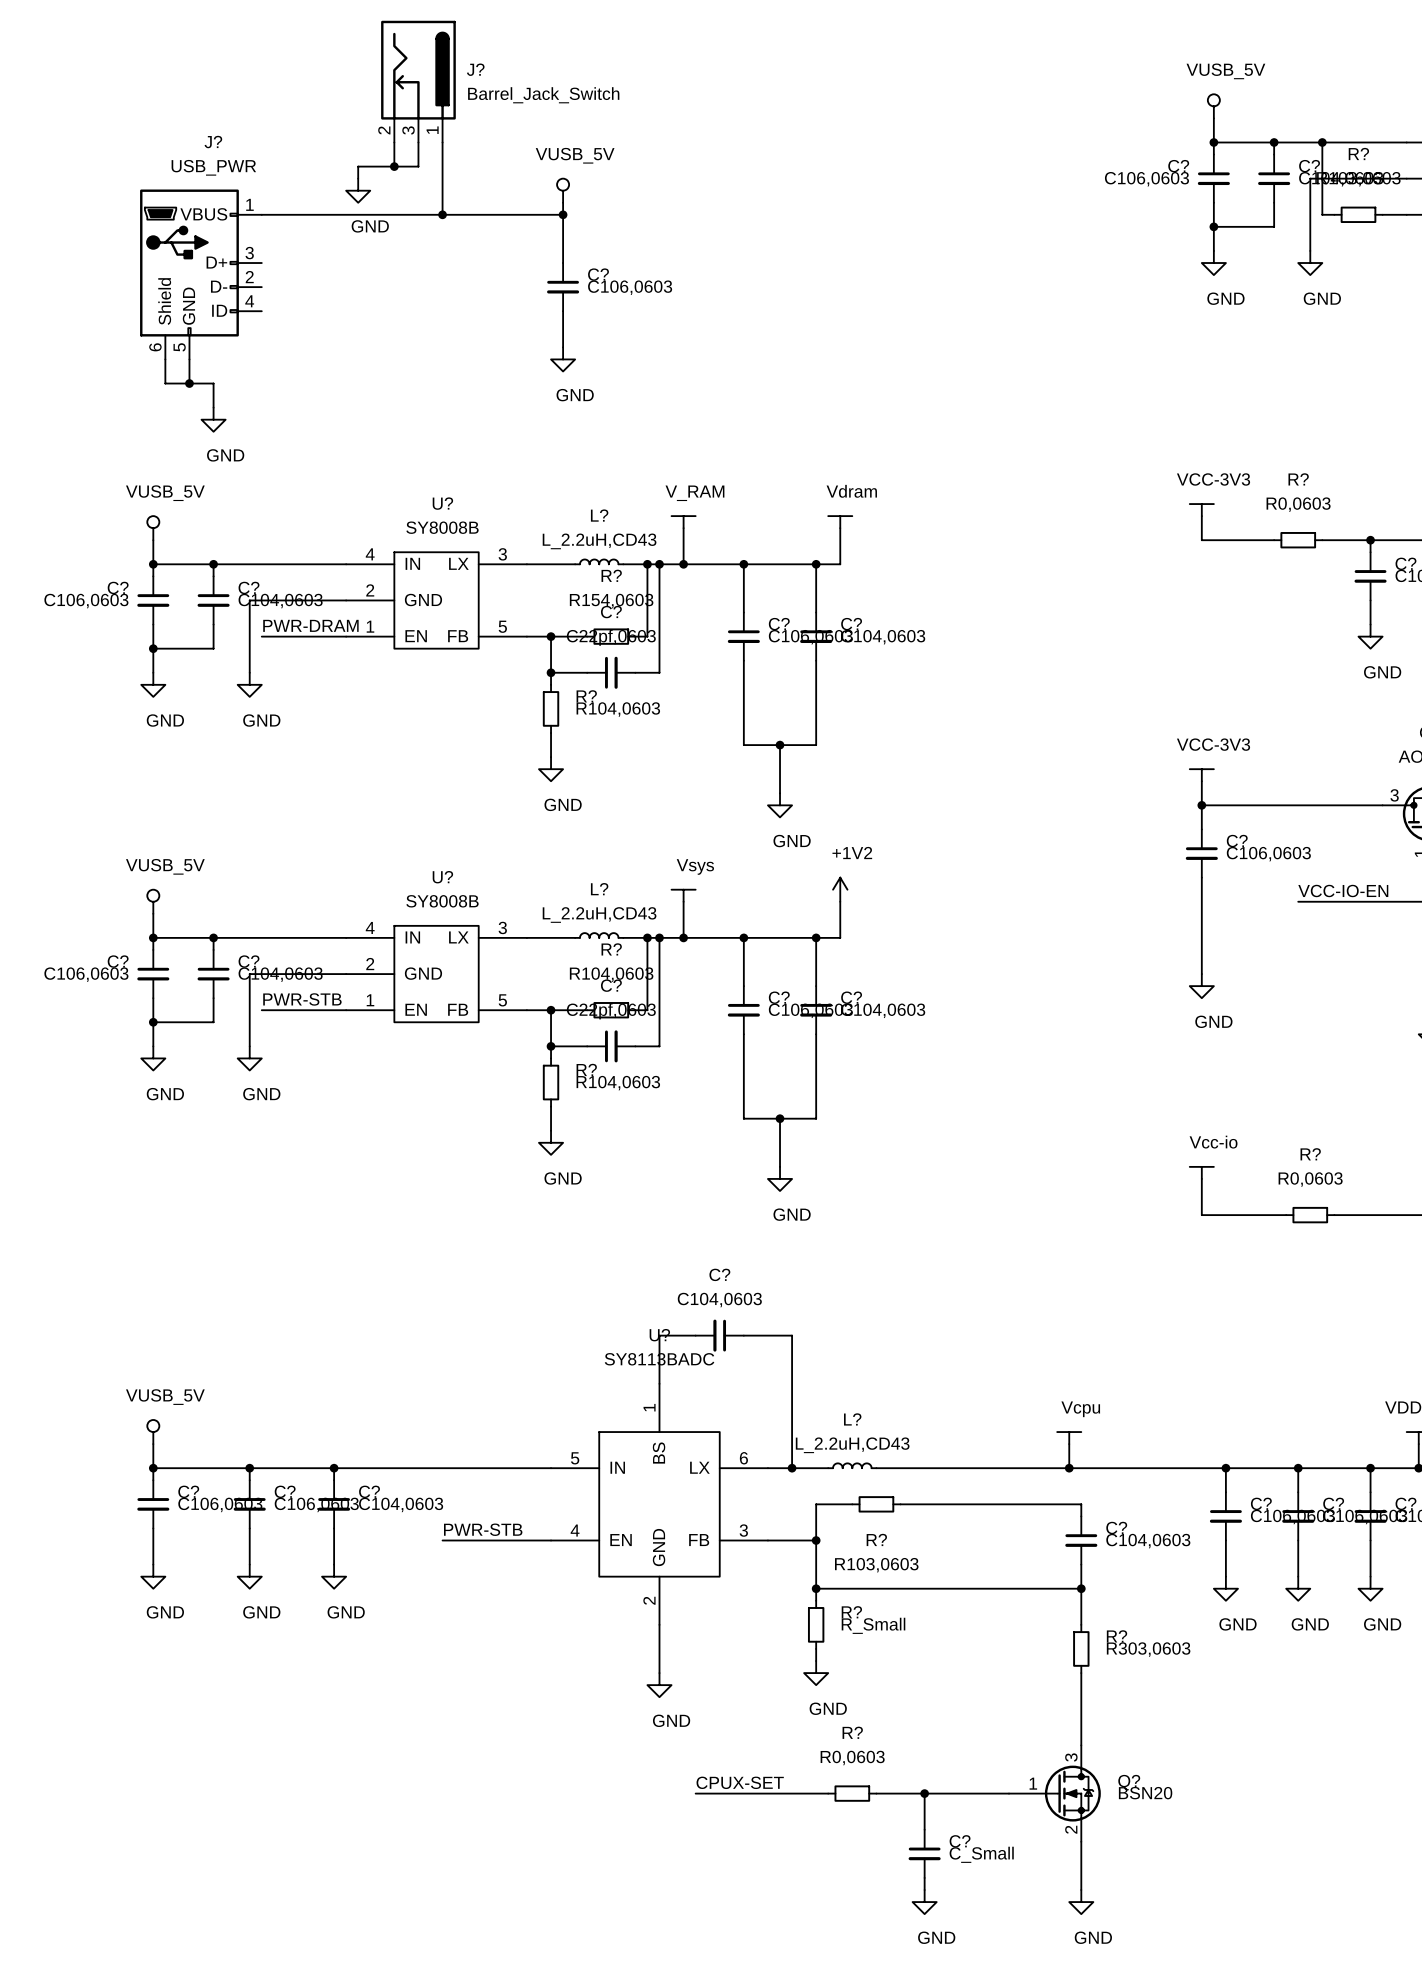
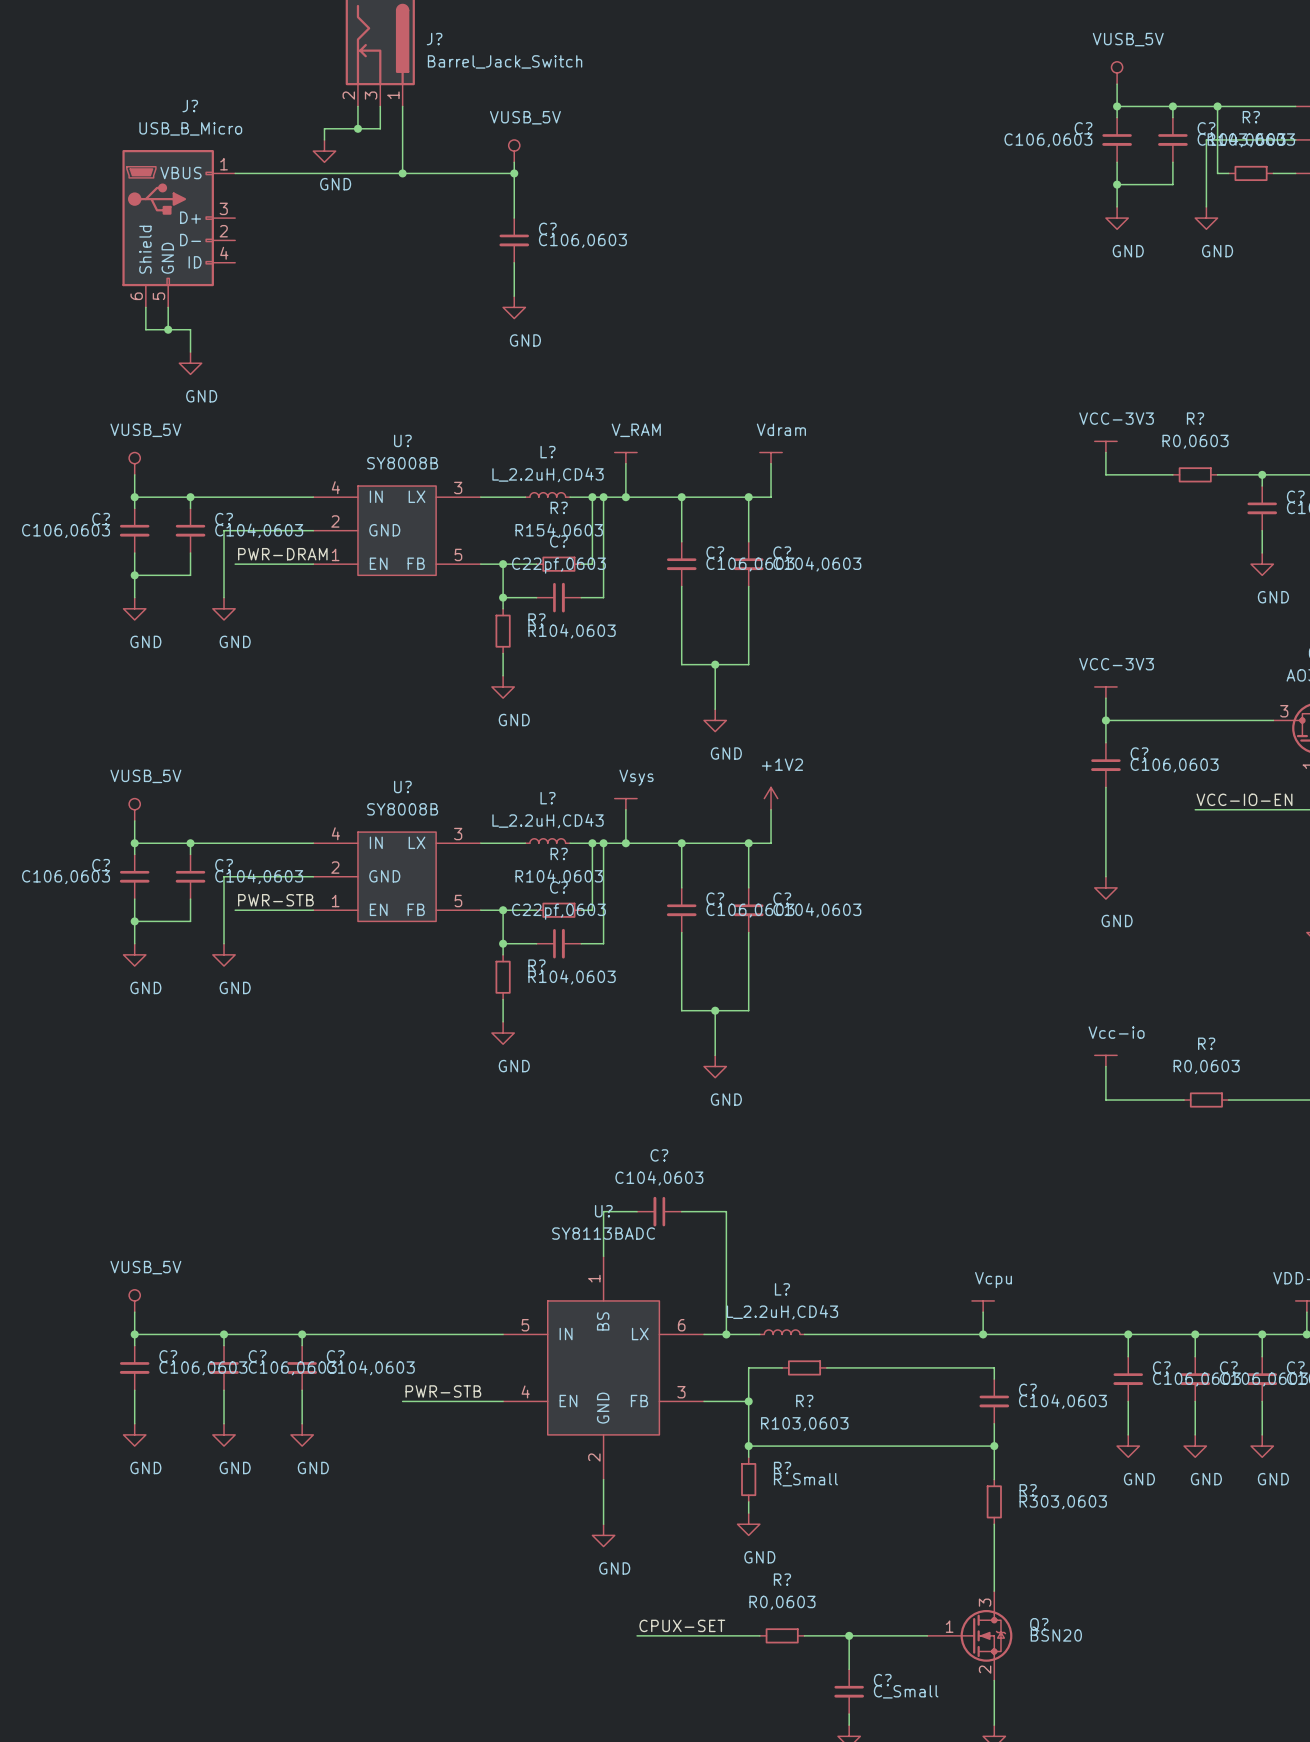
J? value: USB_PWR (213, 167) -> USB_B_Micro (190, 128)

